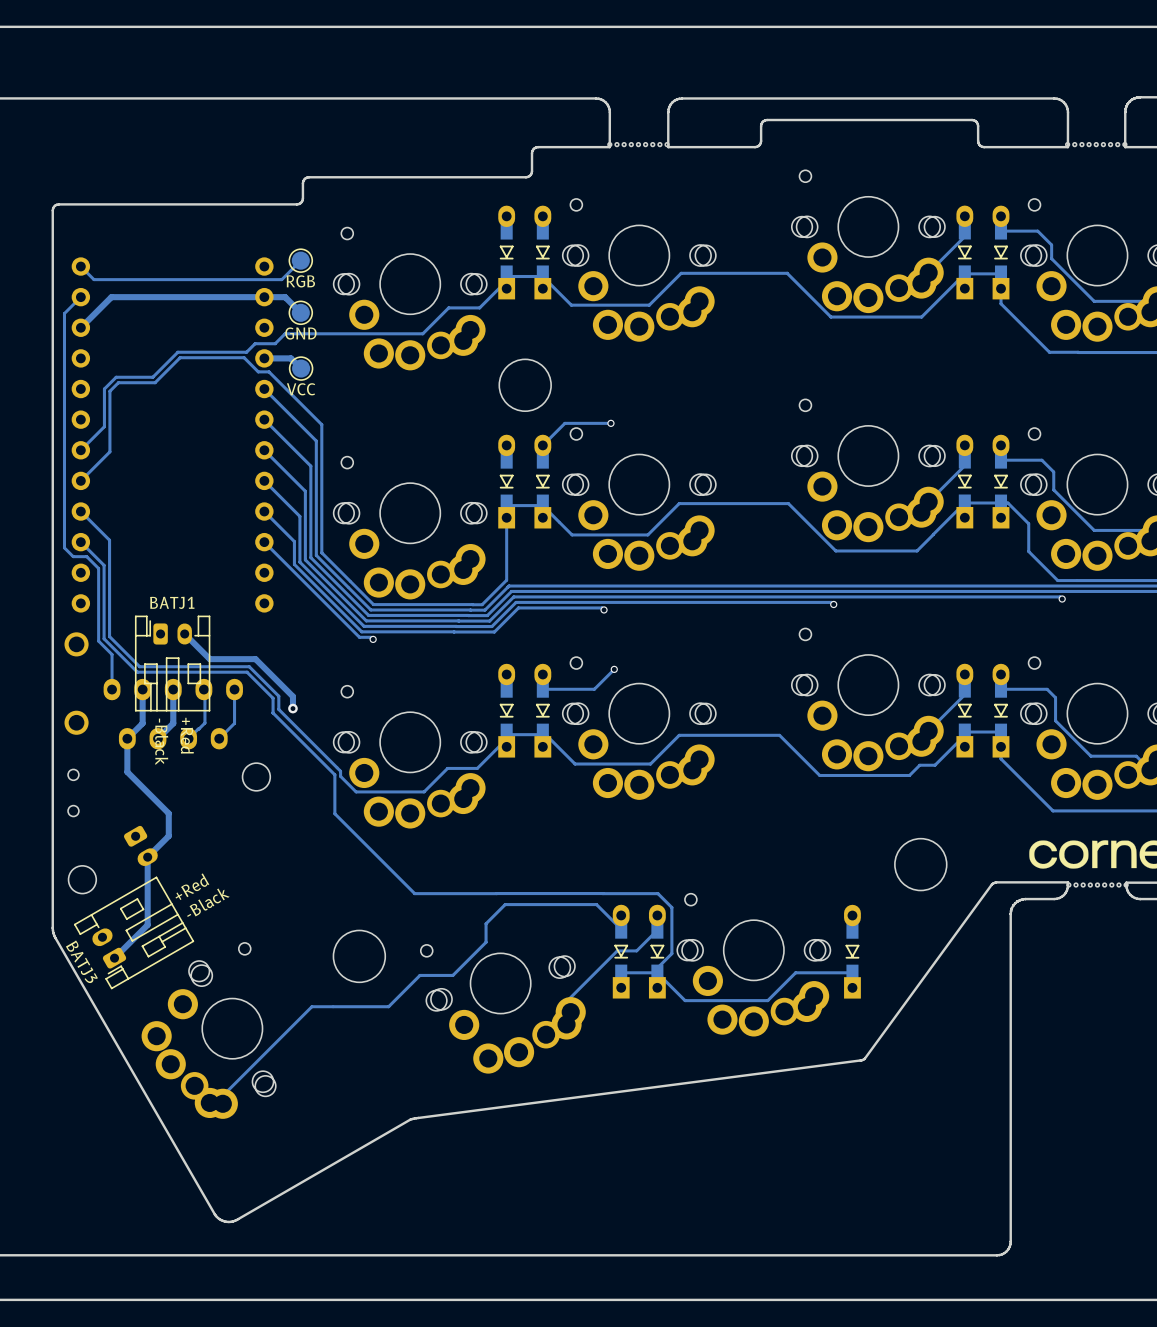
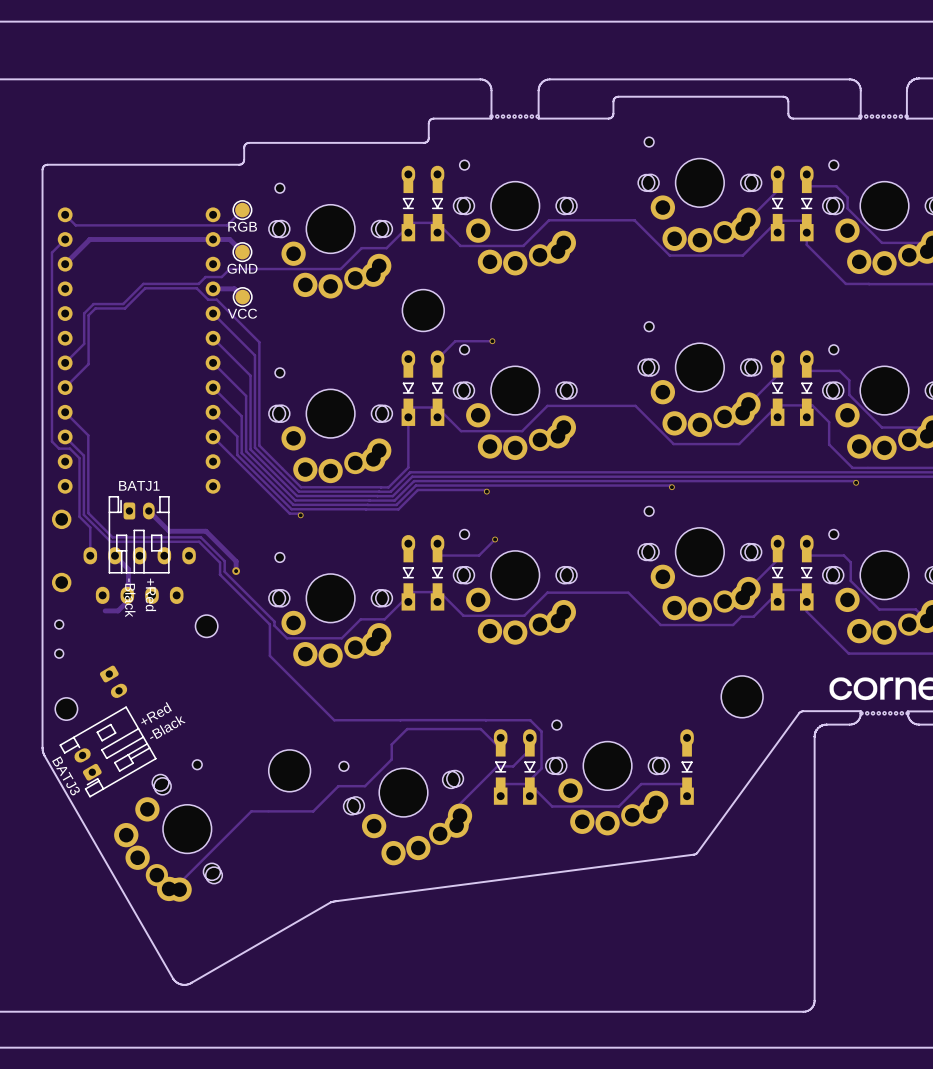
track: (142, 689) (142, 723) (127, 738) (127, 772) (168, 813) (168, 836) (147, 857) (147, 924) (114, 958) -> (114, 555) (128, 569) (128, 600) (118, 610) (105, 610)
track: (173, 689) (173, 723) (157, 738) -> none
track: (203, 689) (204, 686) (204, 723) (188, 738) -> none
track: (234, 689) (234, 723) (219, 738) -> none

